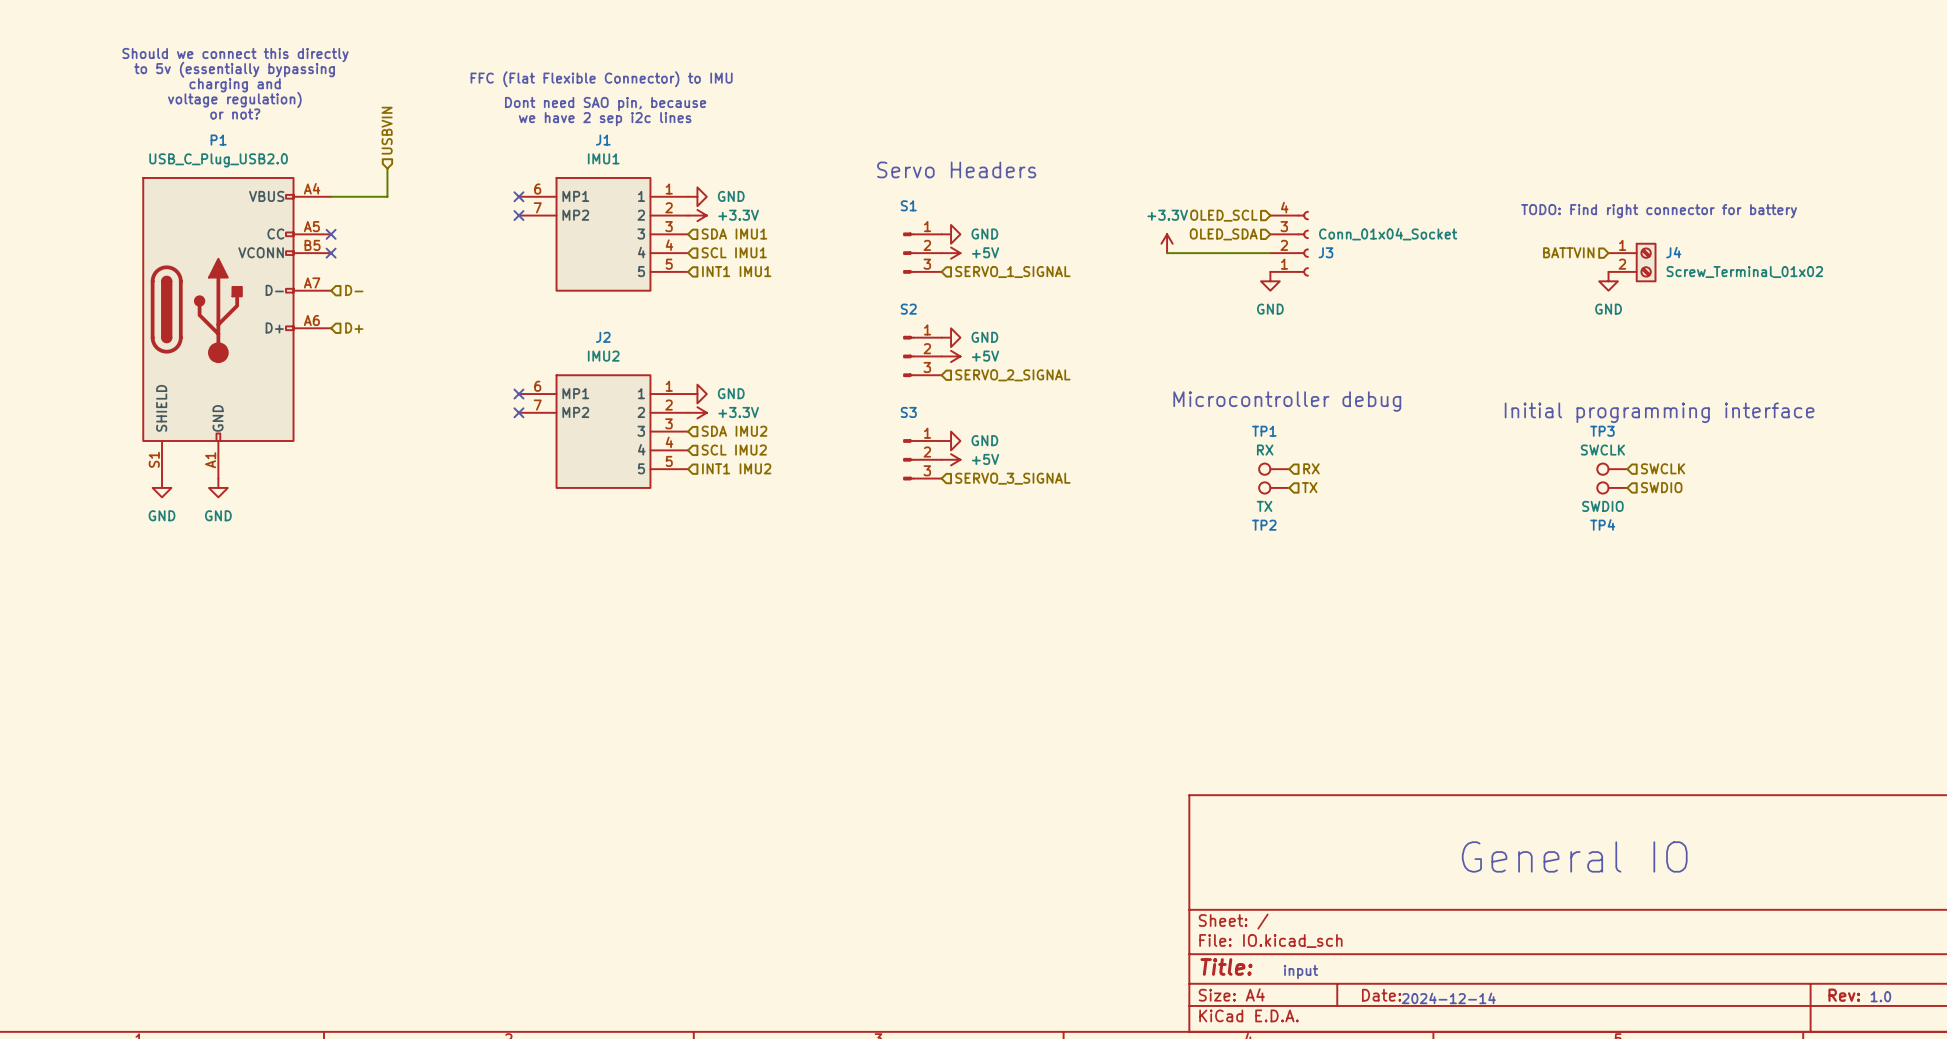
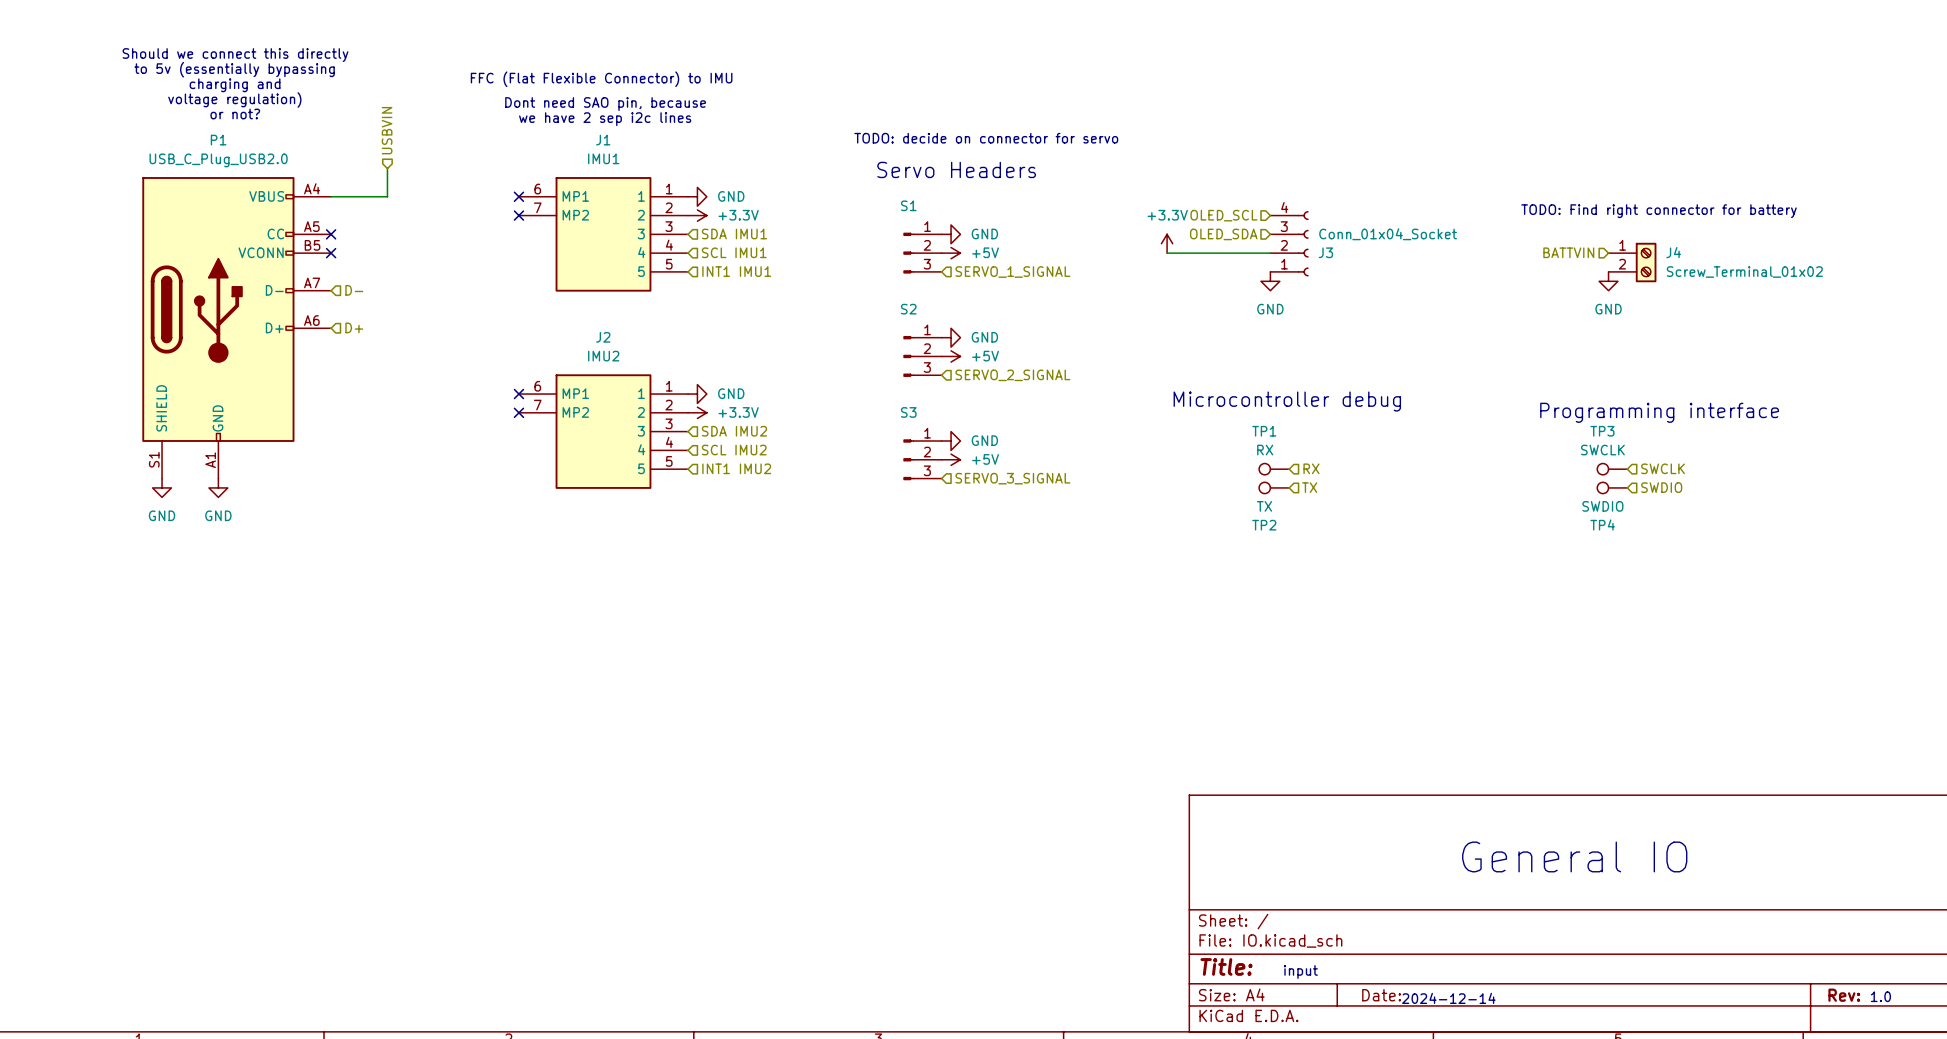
text: none -> TODO: decide on connector for servo (986, 138)
text: Initial programming interface (1659, 412) -> Programming interface (1659, 412)

